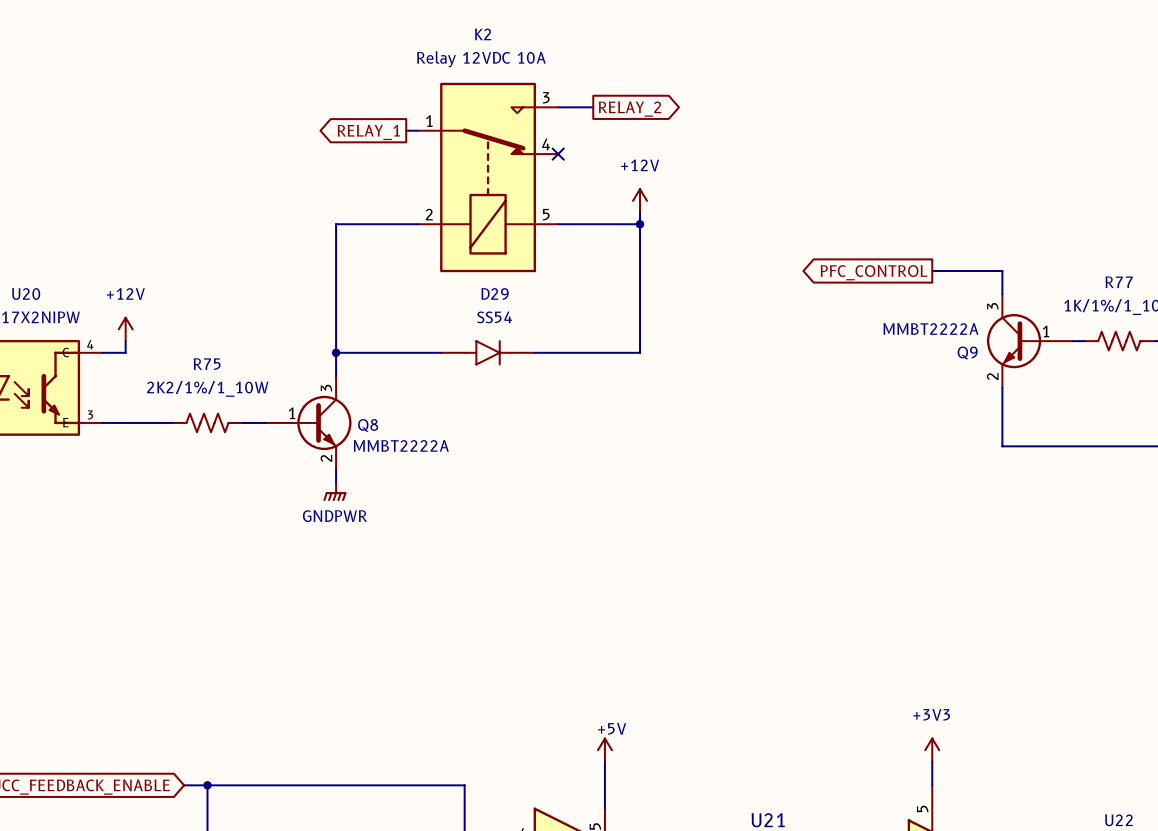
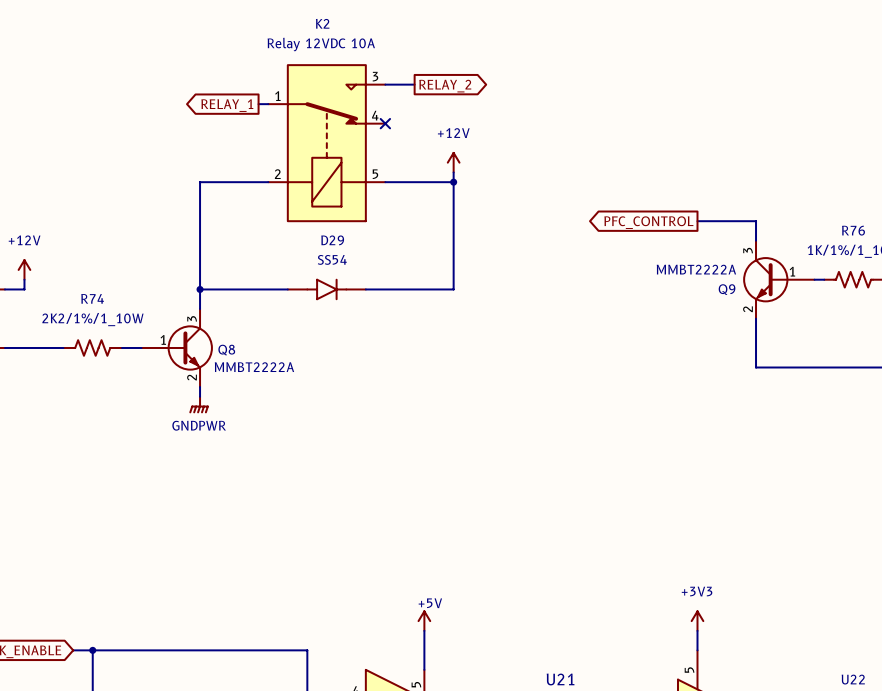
R77 name: R77 (1119, 282) -> R76 (853, 230)
R75 name: R75 (207, 364) -> R74 (92, 298)

